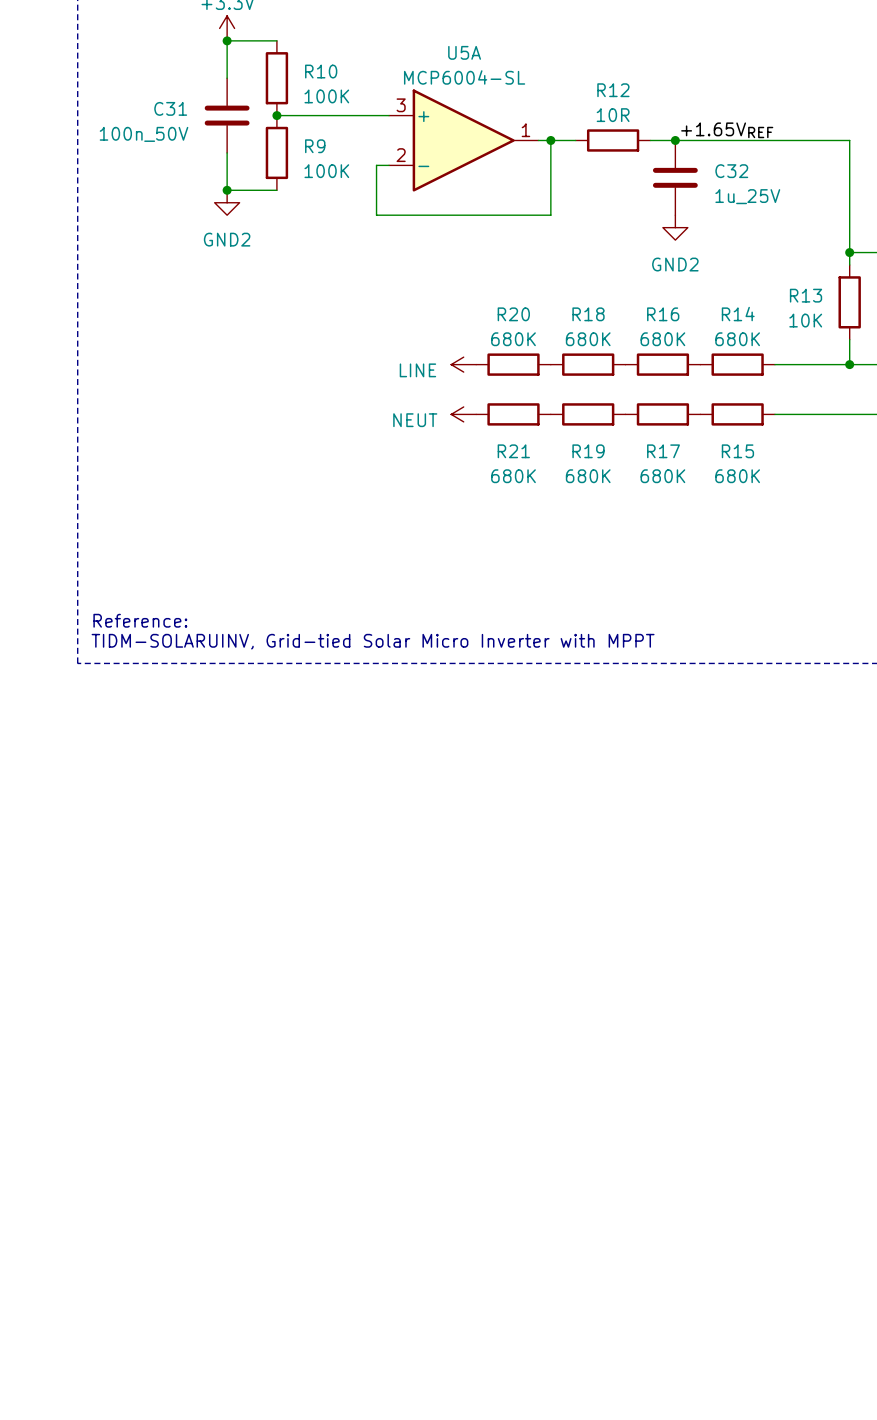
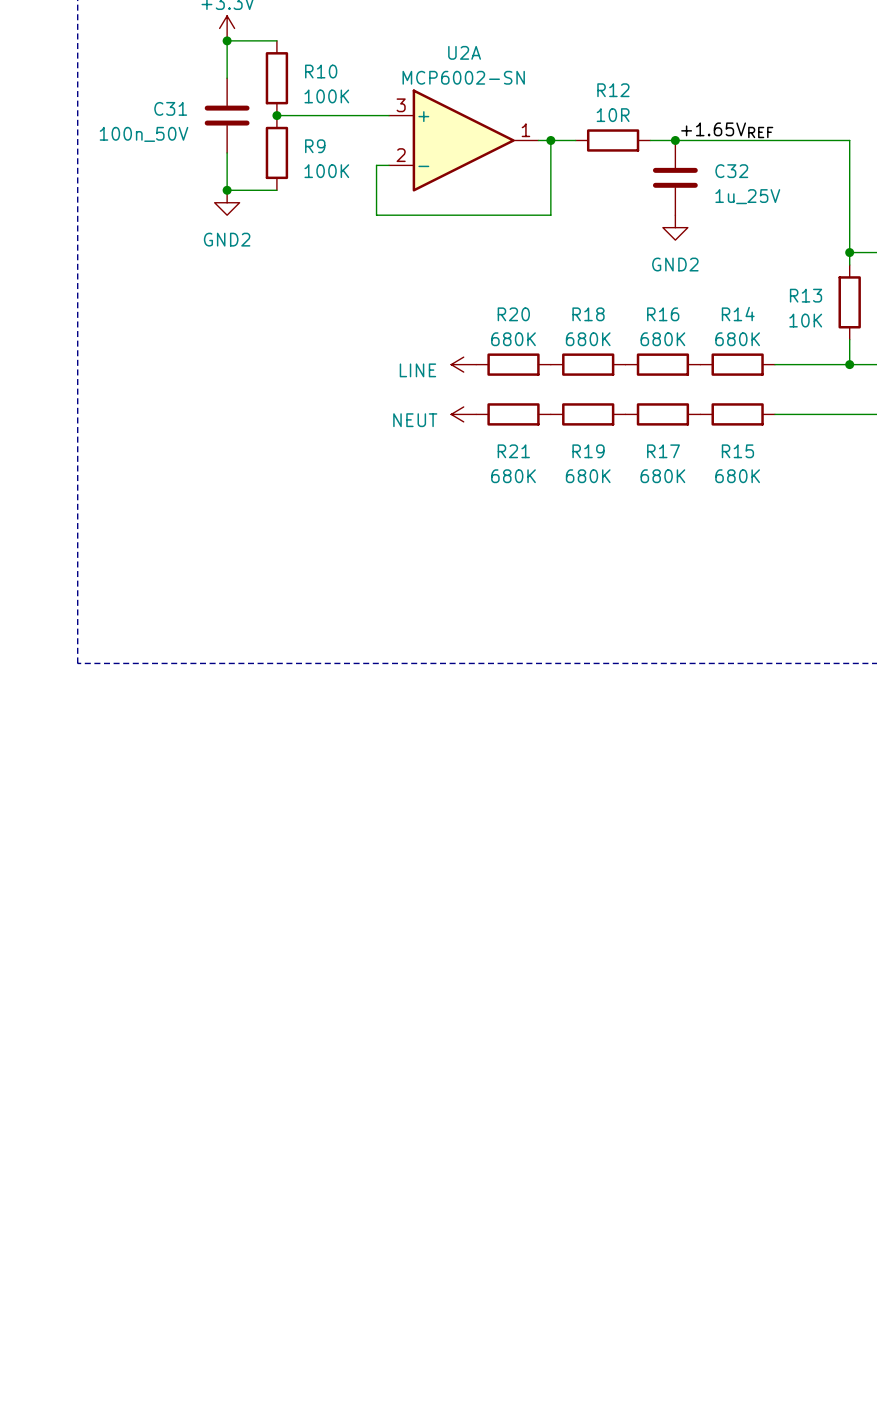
U5A name: U5A (464, 52) -> U2A (464, 52)
U5A value: MCP6004-SL (464, 77) -> MCP6002-SN (463, 77)
text: Reference: (140, 620) -> none
text: TIDM-SOLARUINV, Grid-tied Solar Micro Inverter with MPPT (373, 641) -> none

